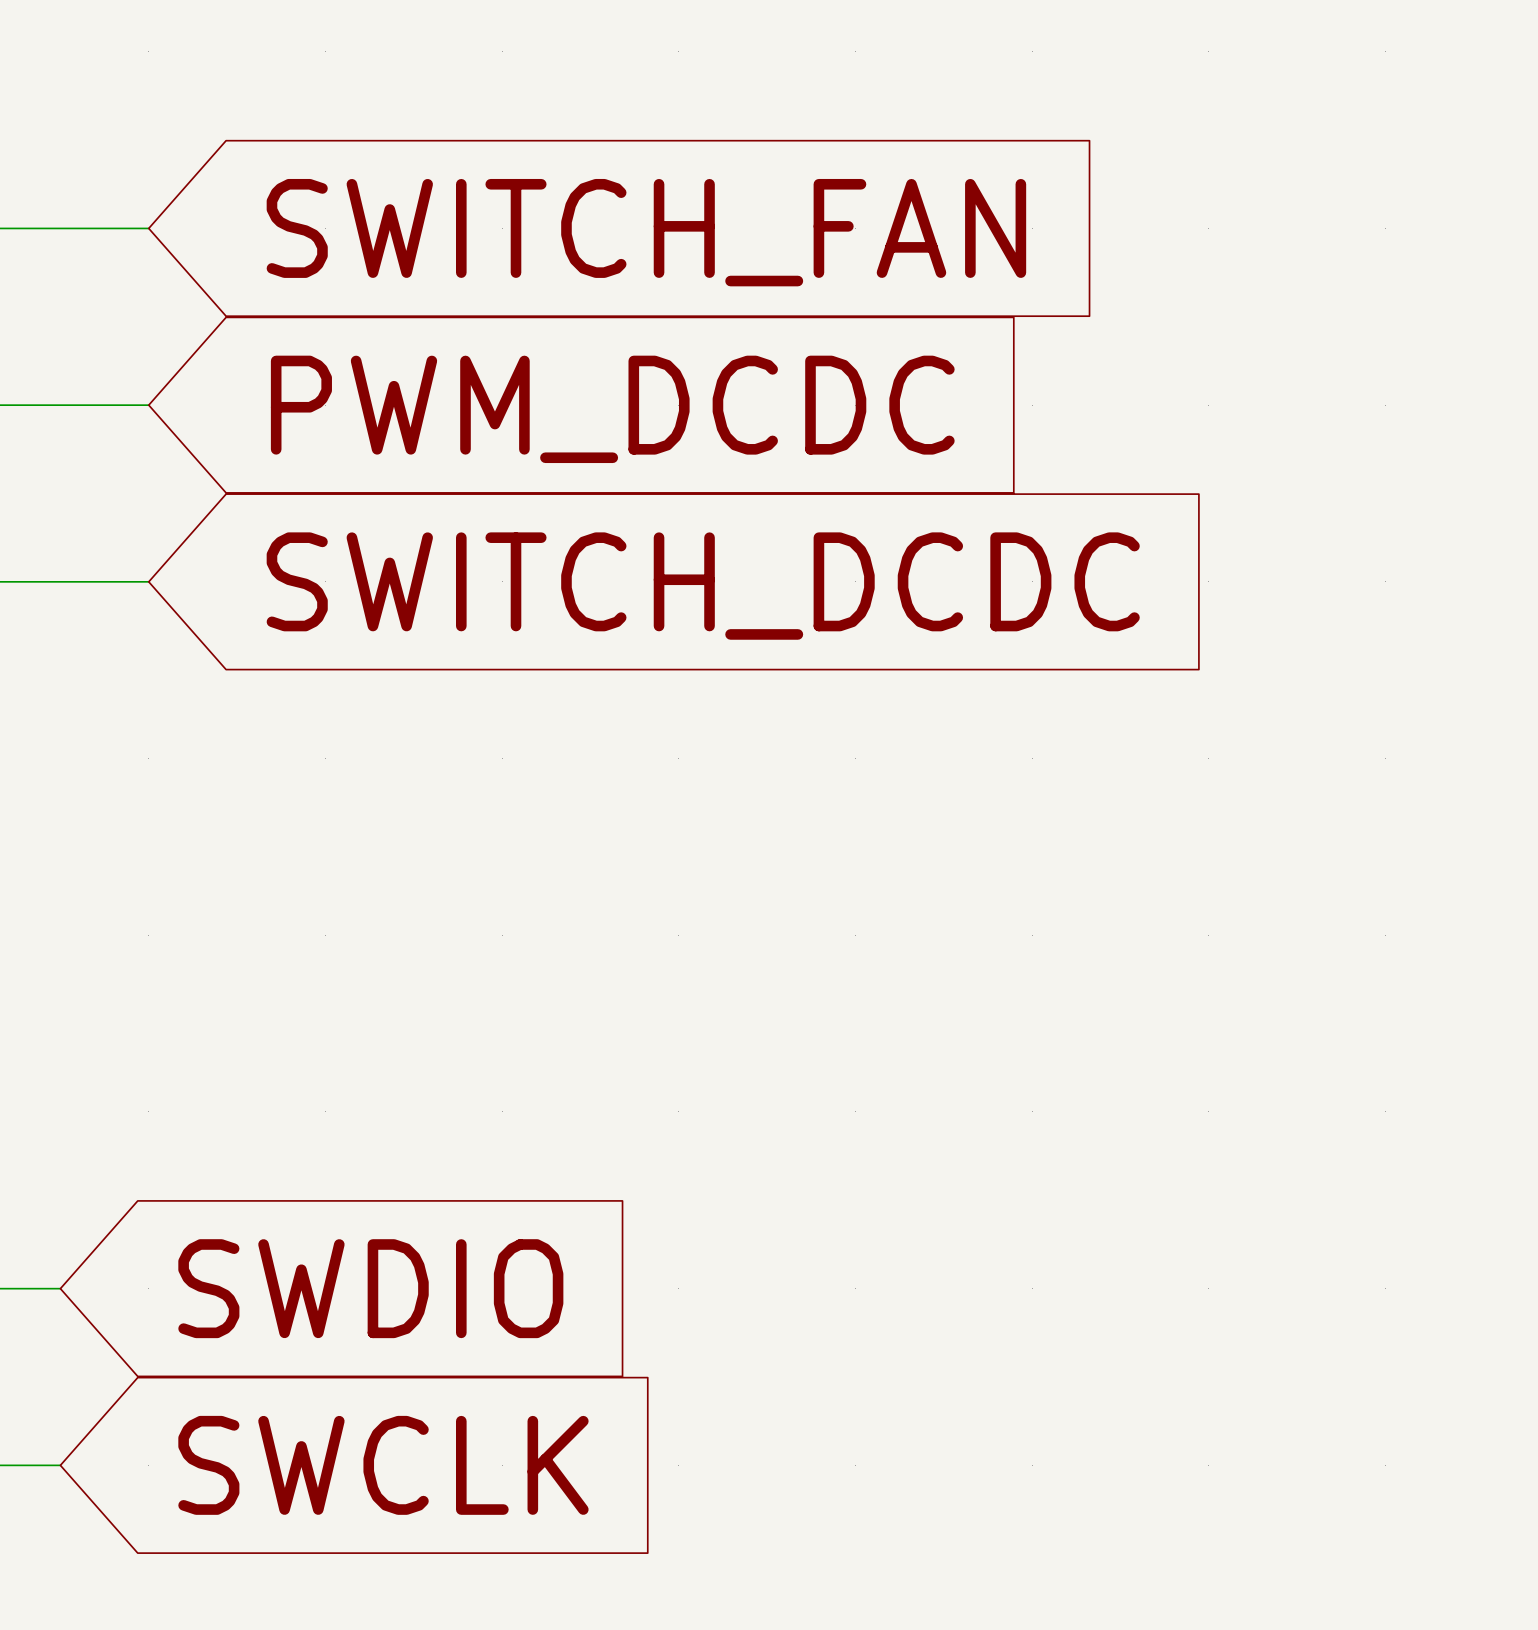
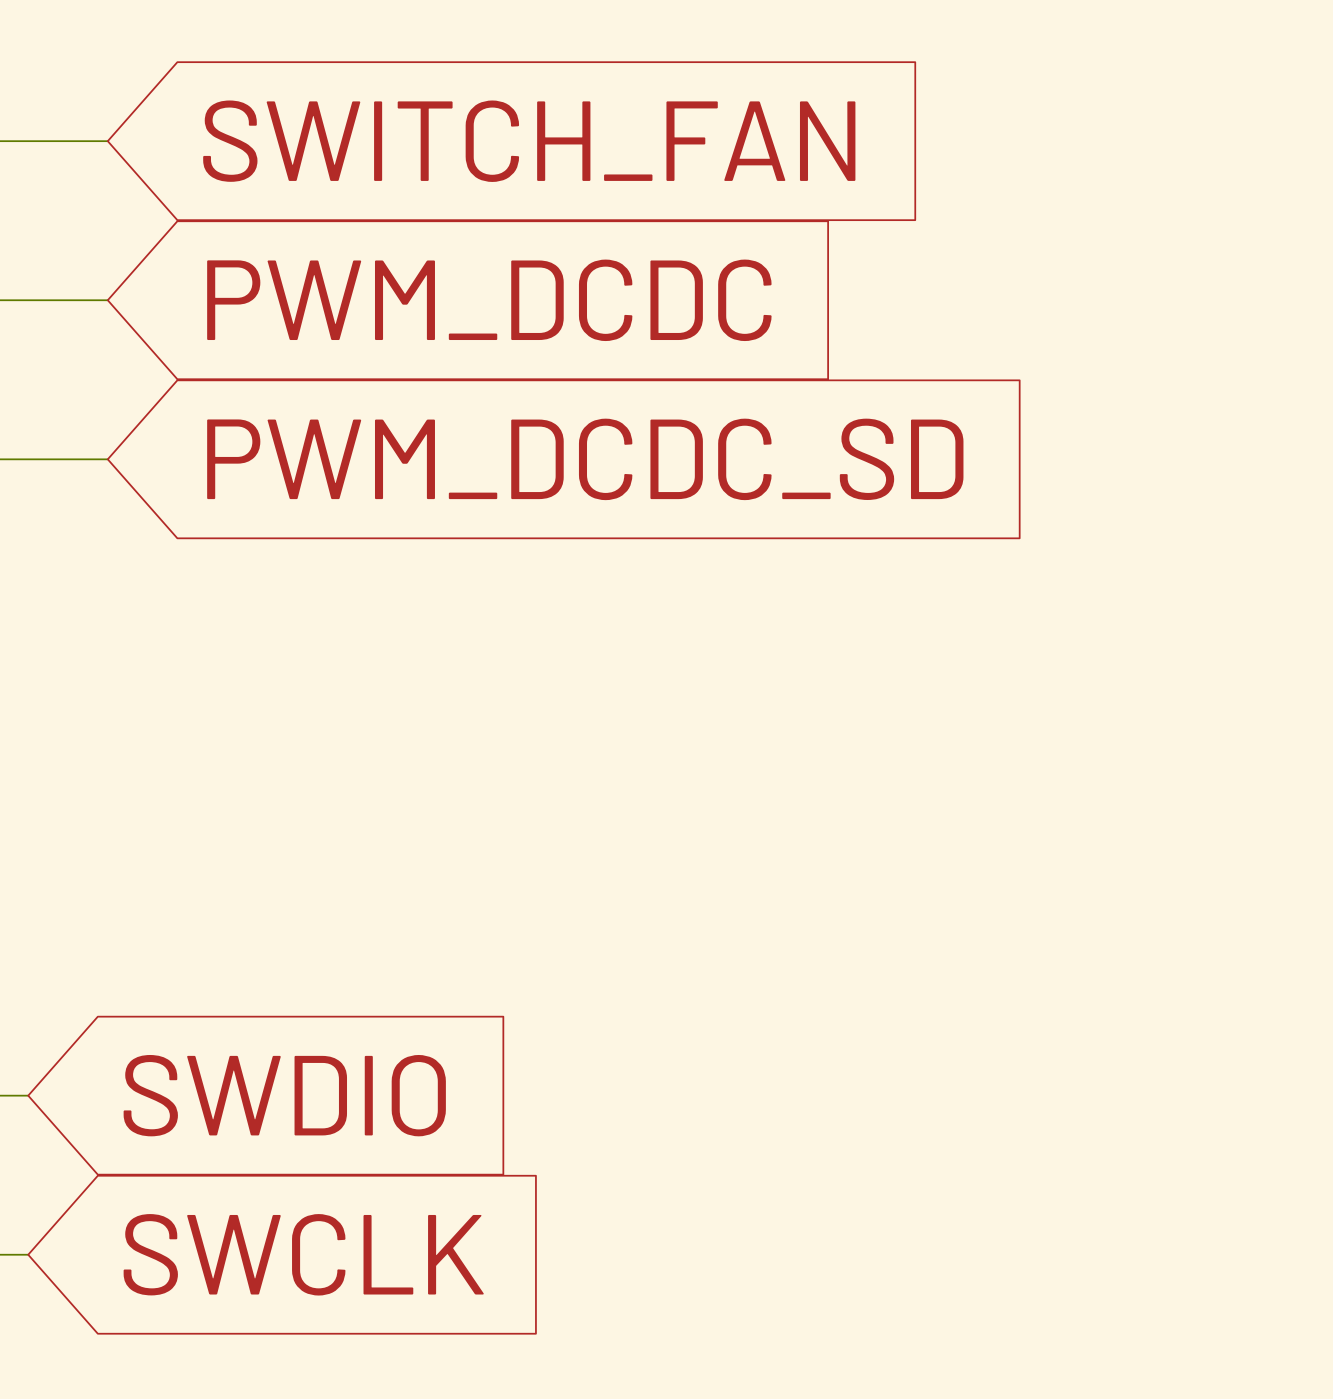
global label: SWITCH_DCDC (703, 586) -> PWM_DCDC_SD (585, 459)

